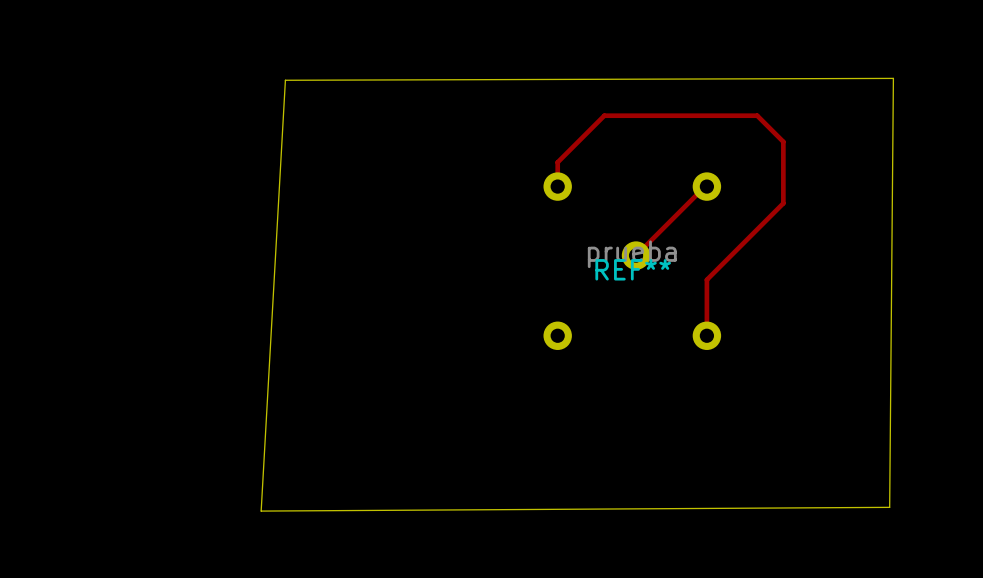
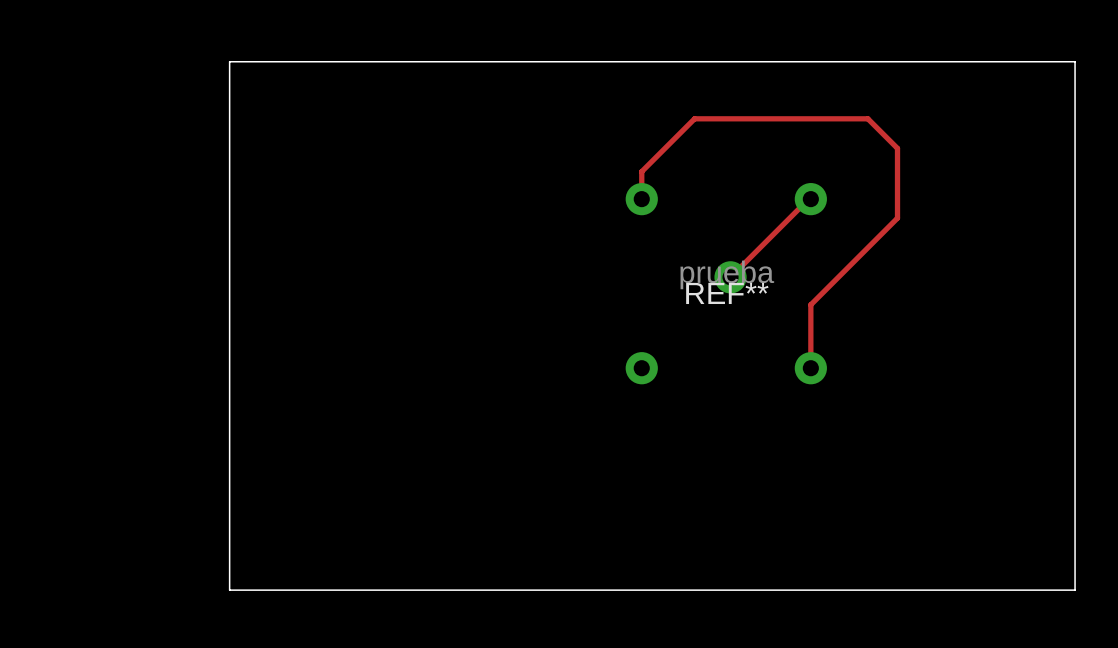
board edge: (893, 78) (889, 507) (261, 511) (285, 80) (893, 78) -> (229, 61) (229, 590) (1075, 590) (1075, 61) (229, 61)

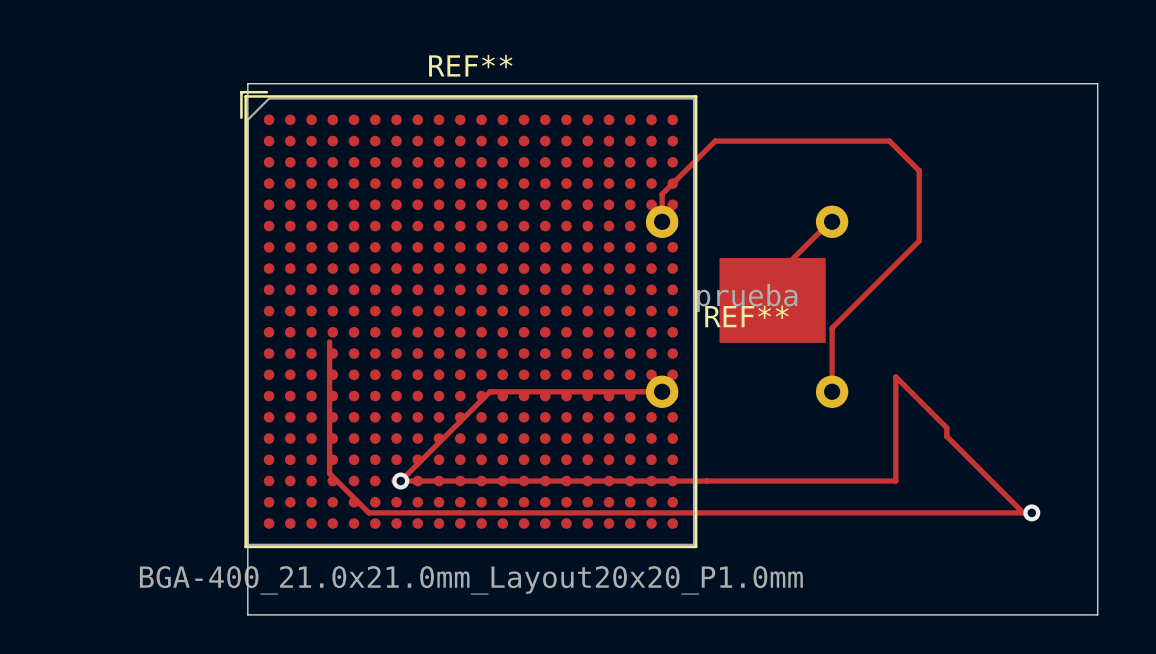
REF** footprint: [625, 183, 827, 385] -> [645, 205, 849, 408]
REF**: none -> BGA-400_21.0x21.0mm_Layout20x20_P1.0mm (468, 319)
track: none -> (329, 341) (329, 473) (368, 512) (1031, 512)
track: none -> (662, 391) (490, 391) (400, 481) (895, 481) (895, 376) (946, 427) (946, 436) (1023, 512)
via: none -> (400, 481)
via: none -> (1031, 512)

